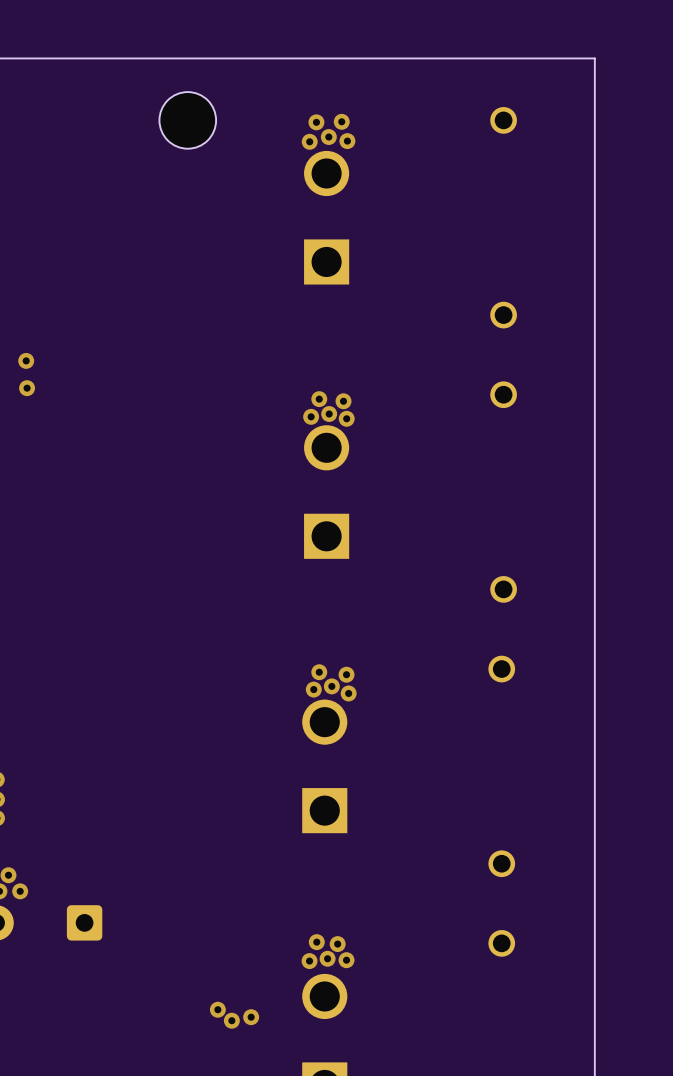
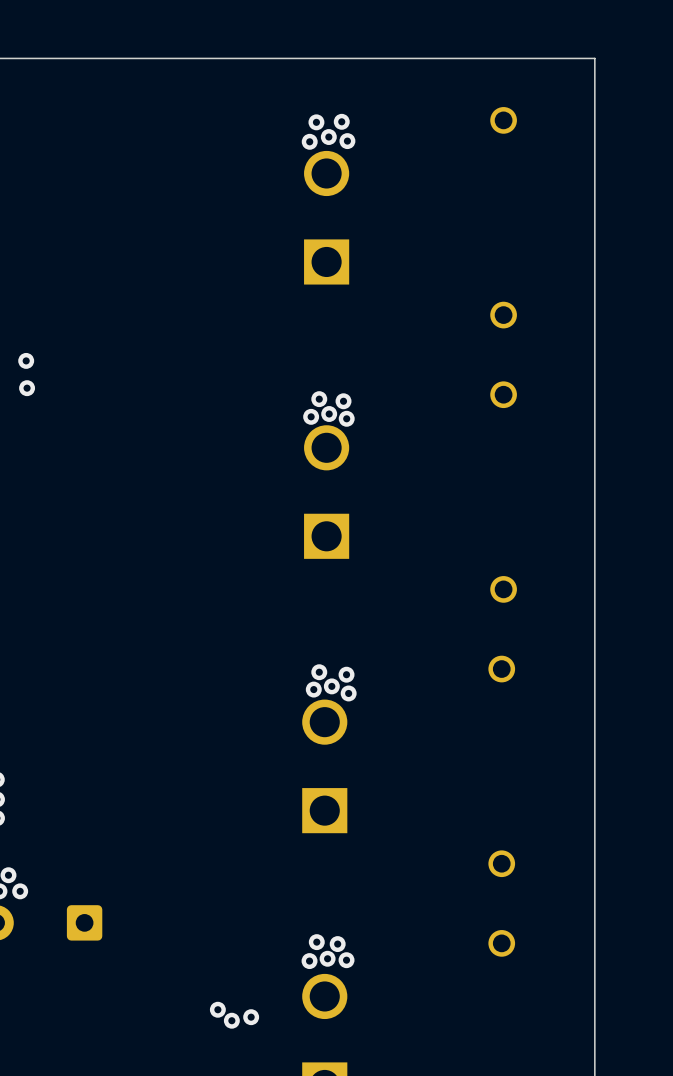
part: (187, 120) -> none

